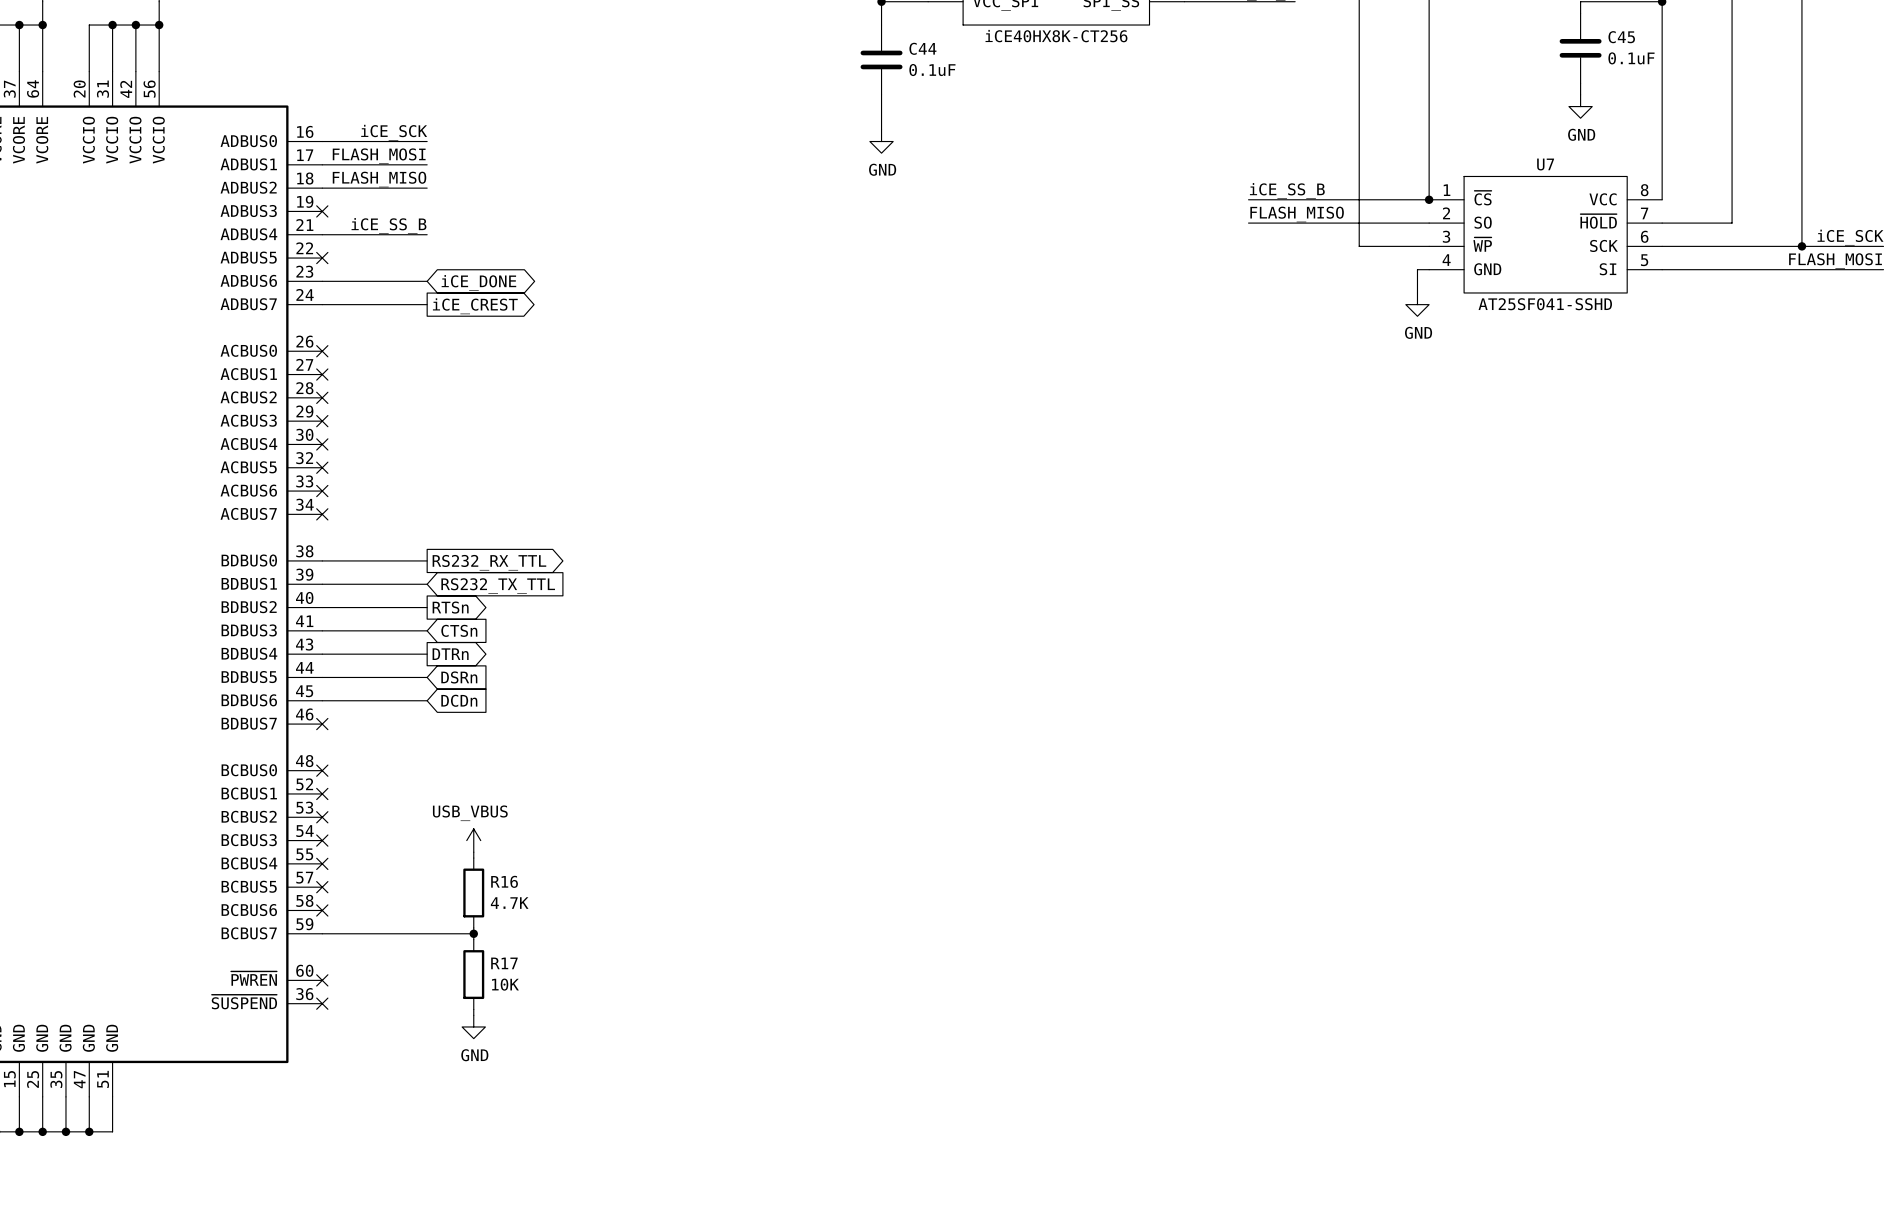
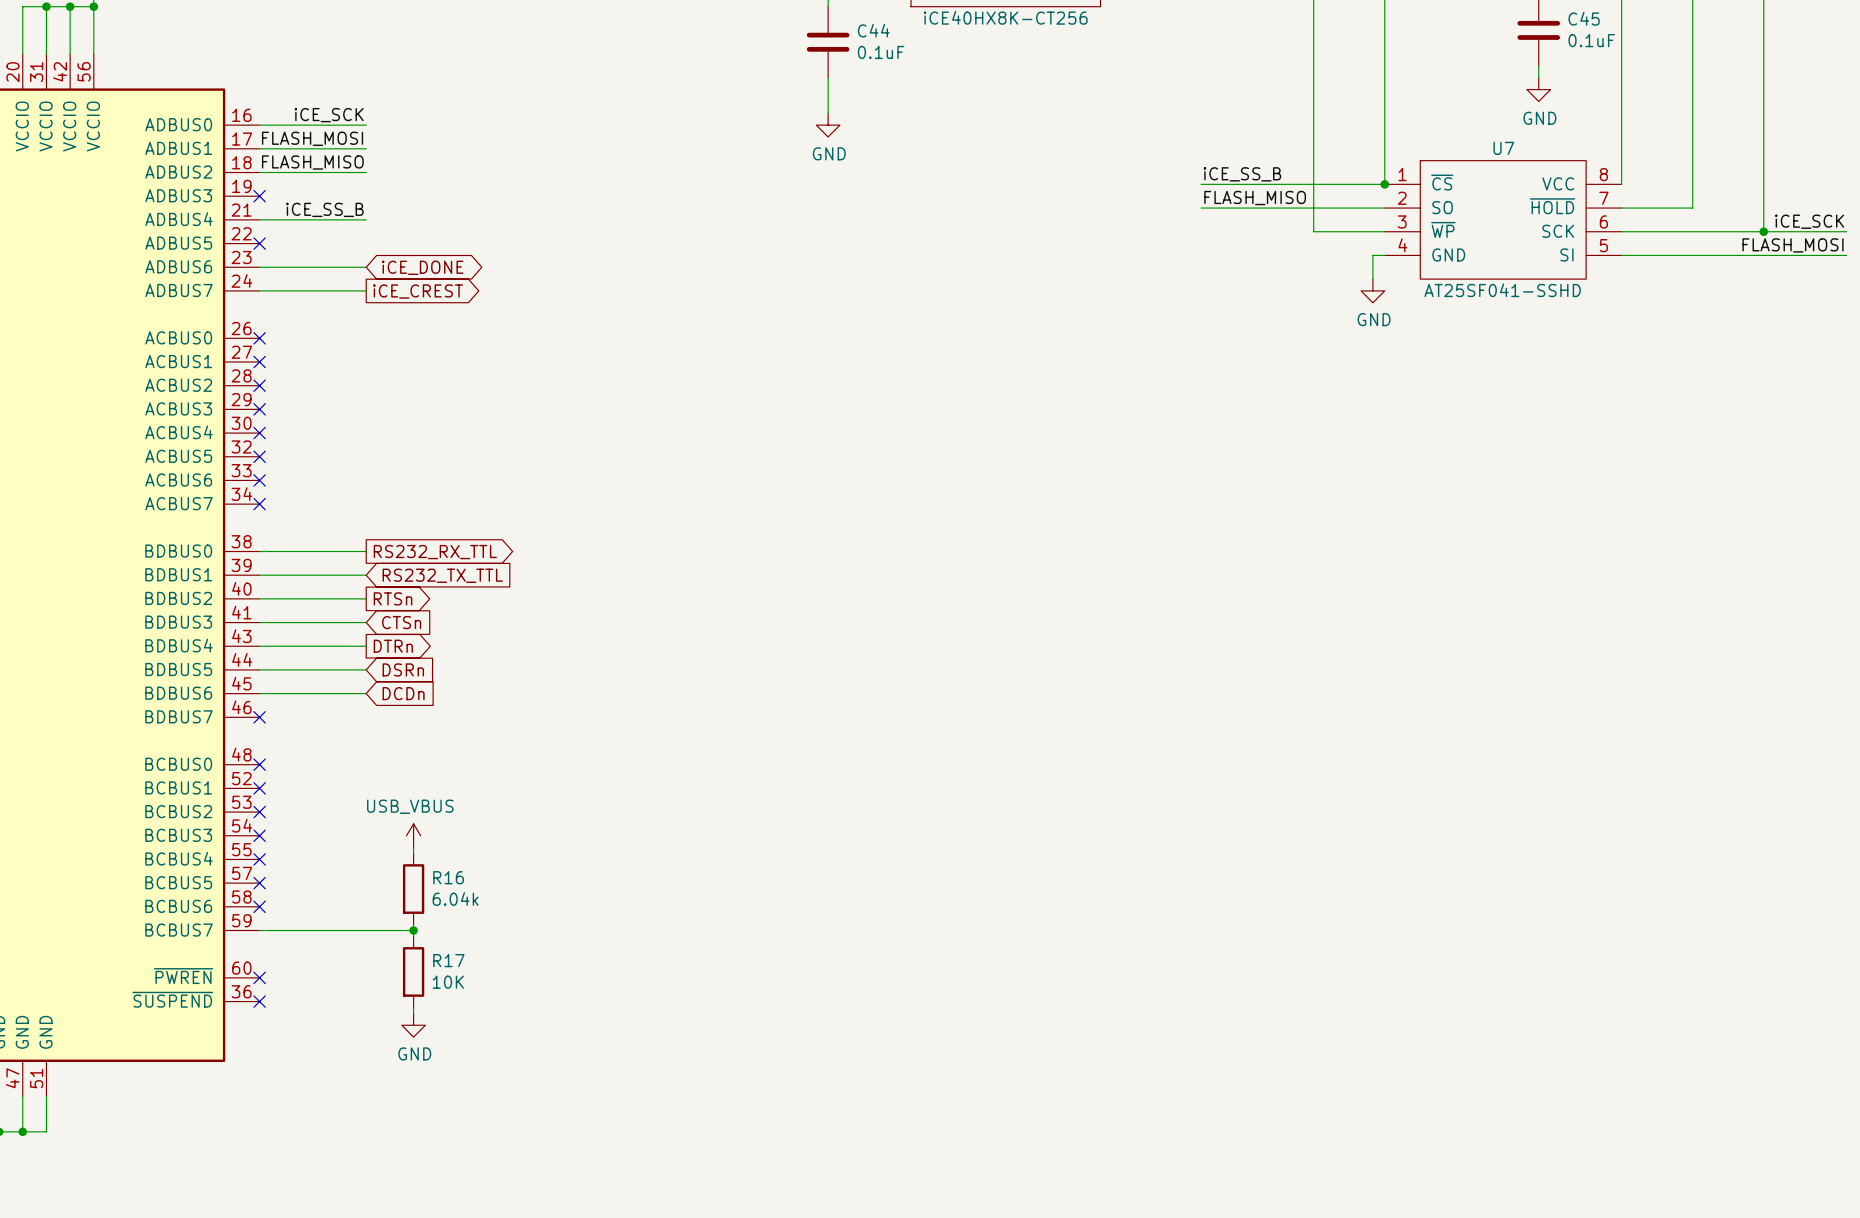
R16 text: 4.7K (509, 903) -> 6.04k (455, 898)

